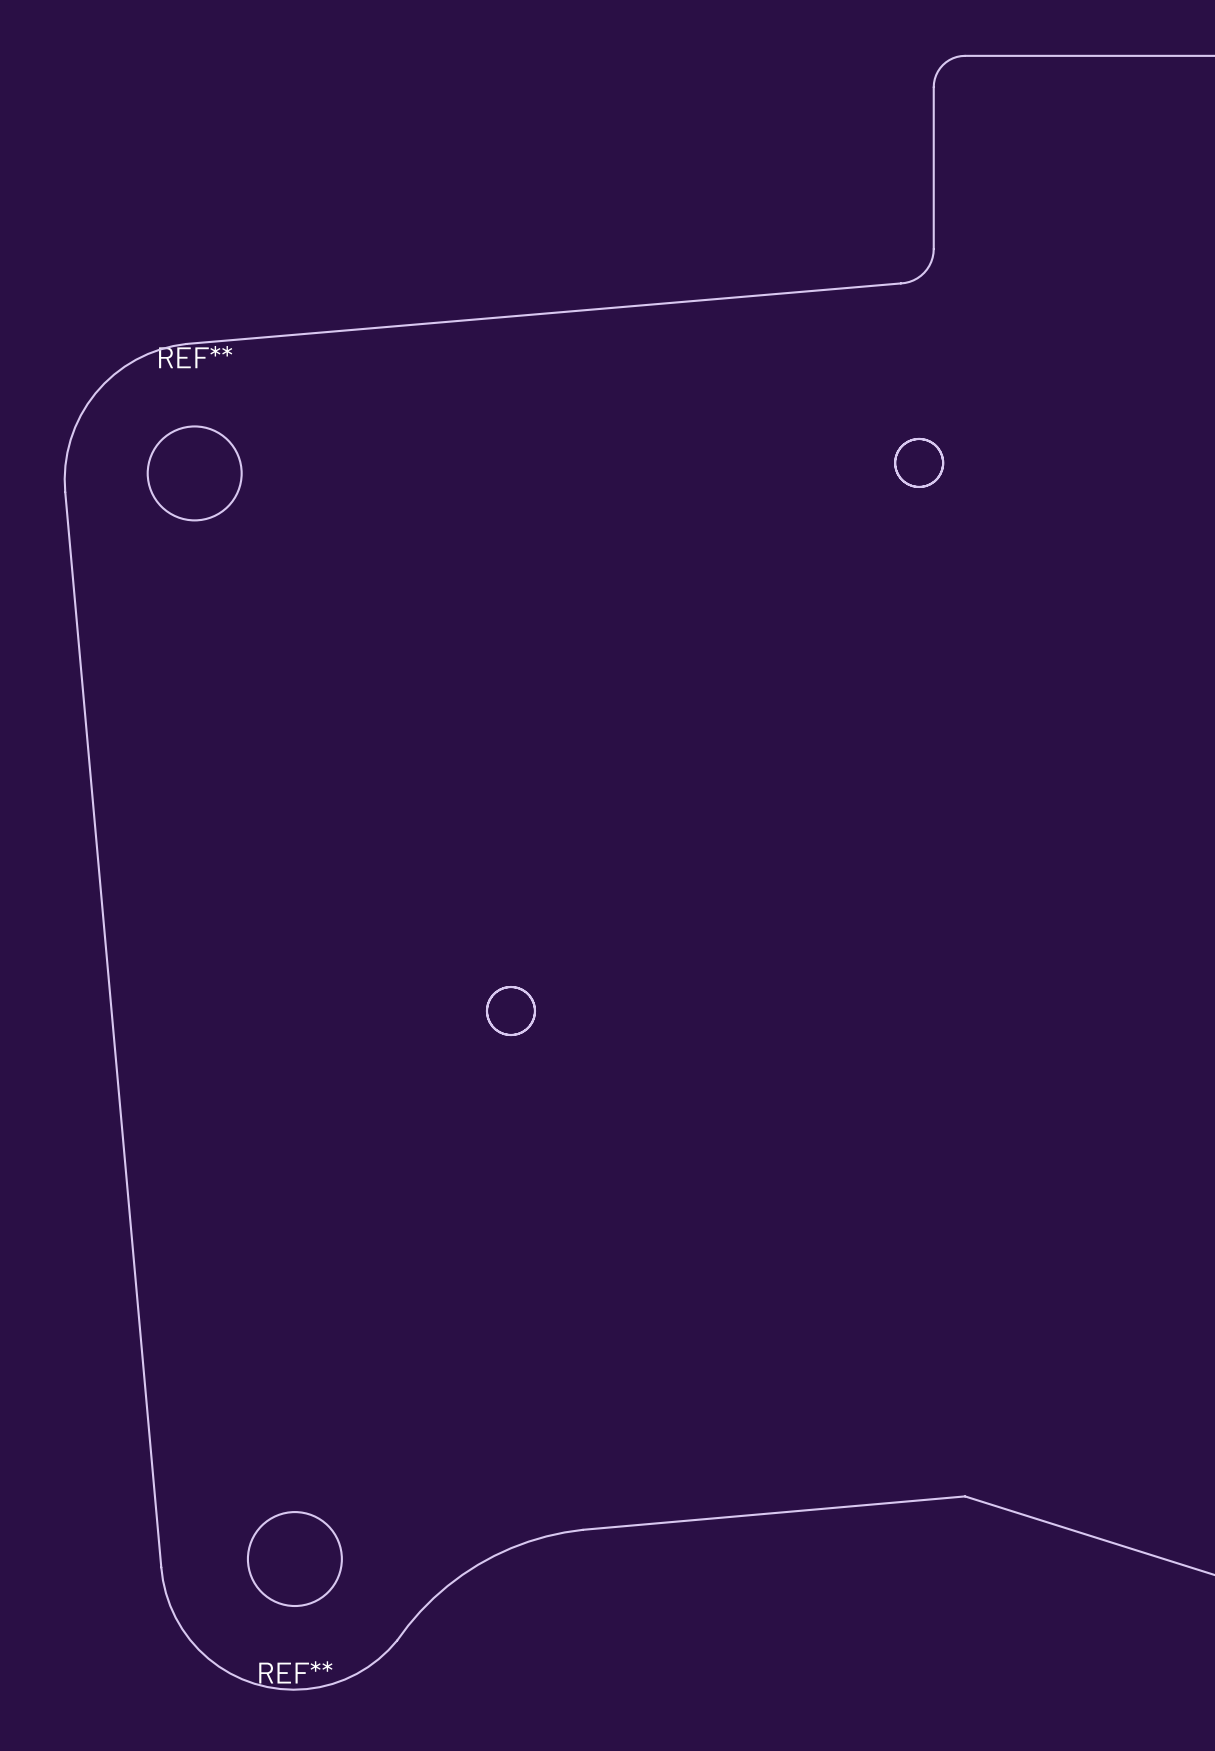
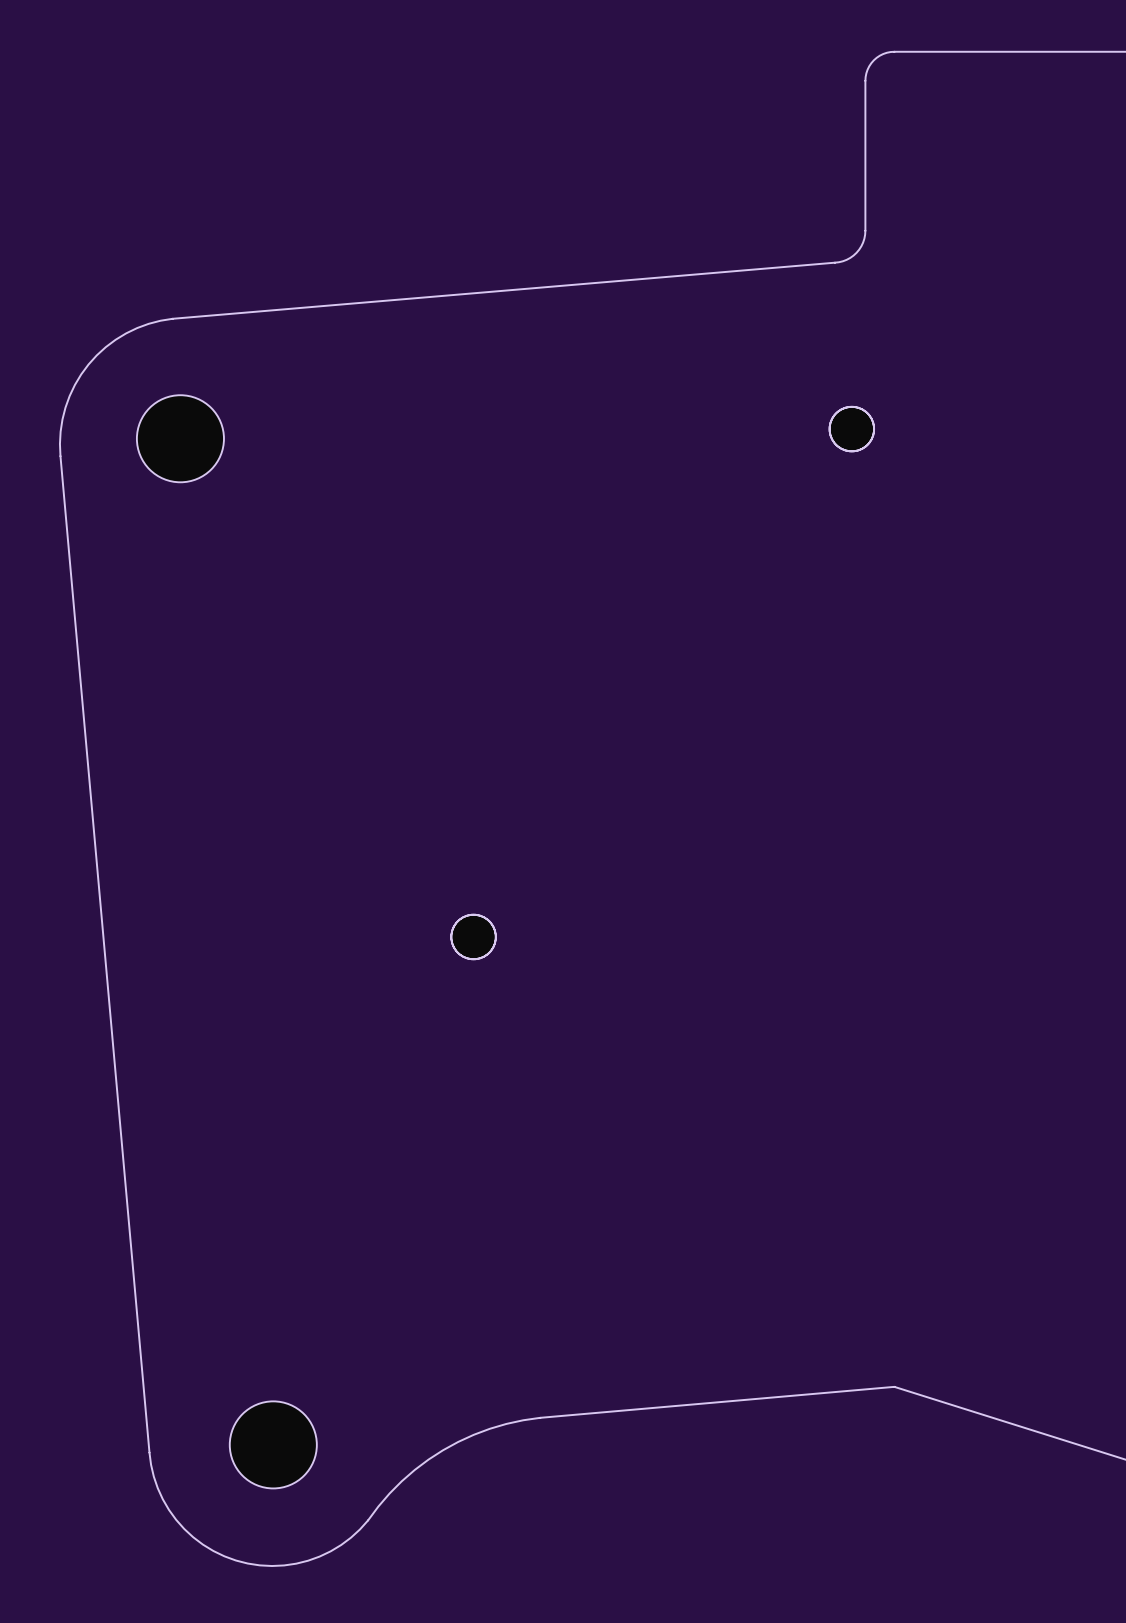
drawing: [894, 437, 945, 489] -> none
part: none -> (851, 429)
REF**: (194, 473) -> none
part: none -> (180, 438)
drawing: [485, 985, 537, 1037] -> none
part: none -> (473, 936)
REF**: (294, 1559) -> none
part: none -> (273, 1444)

